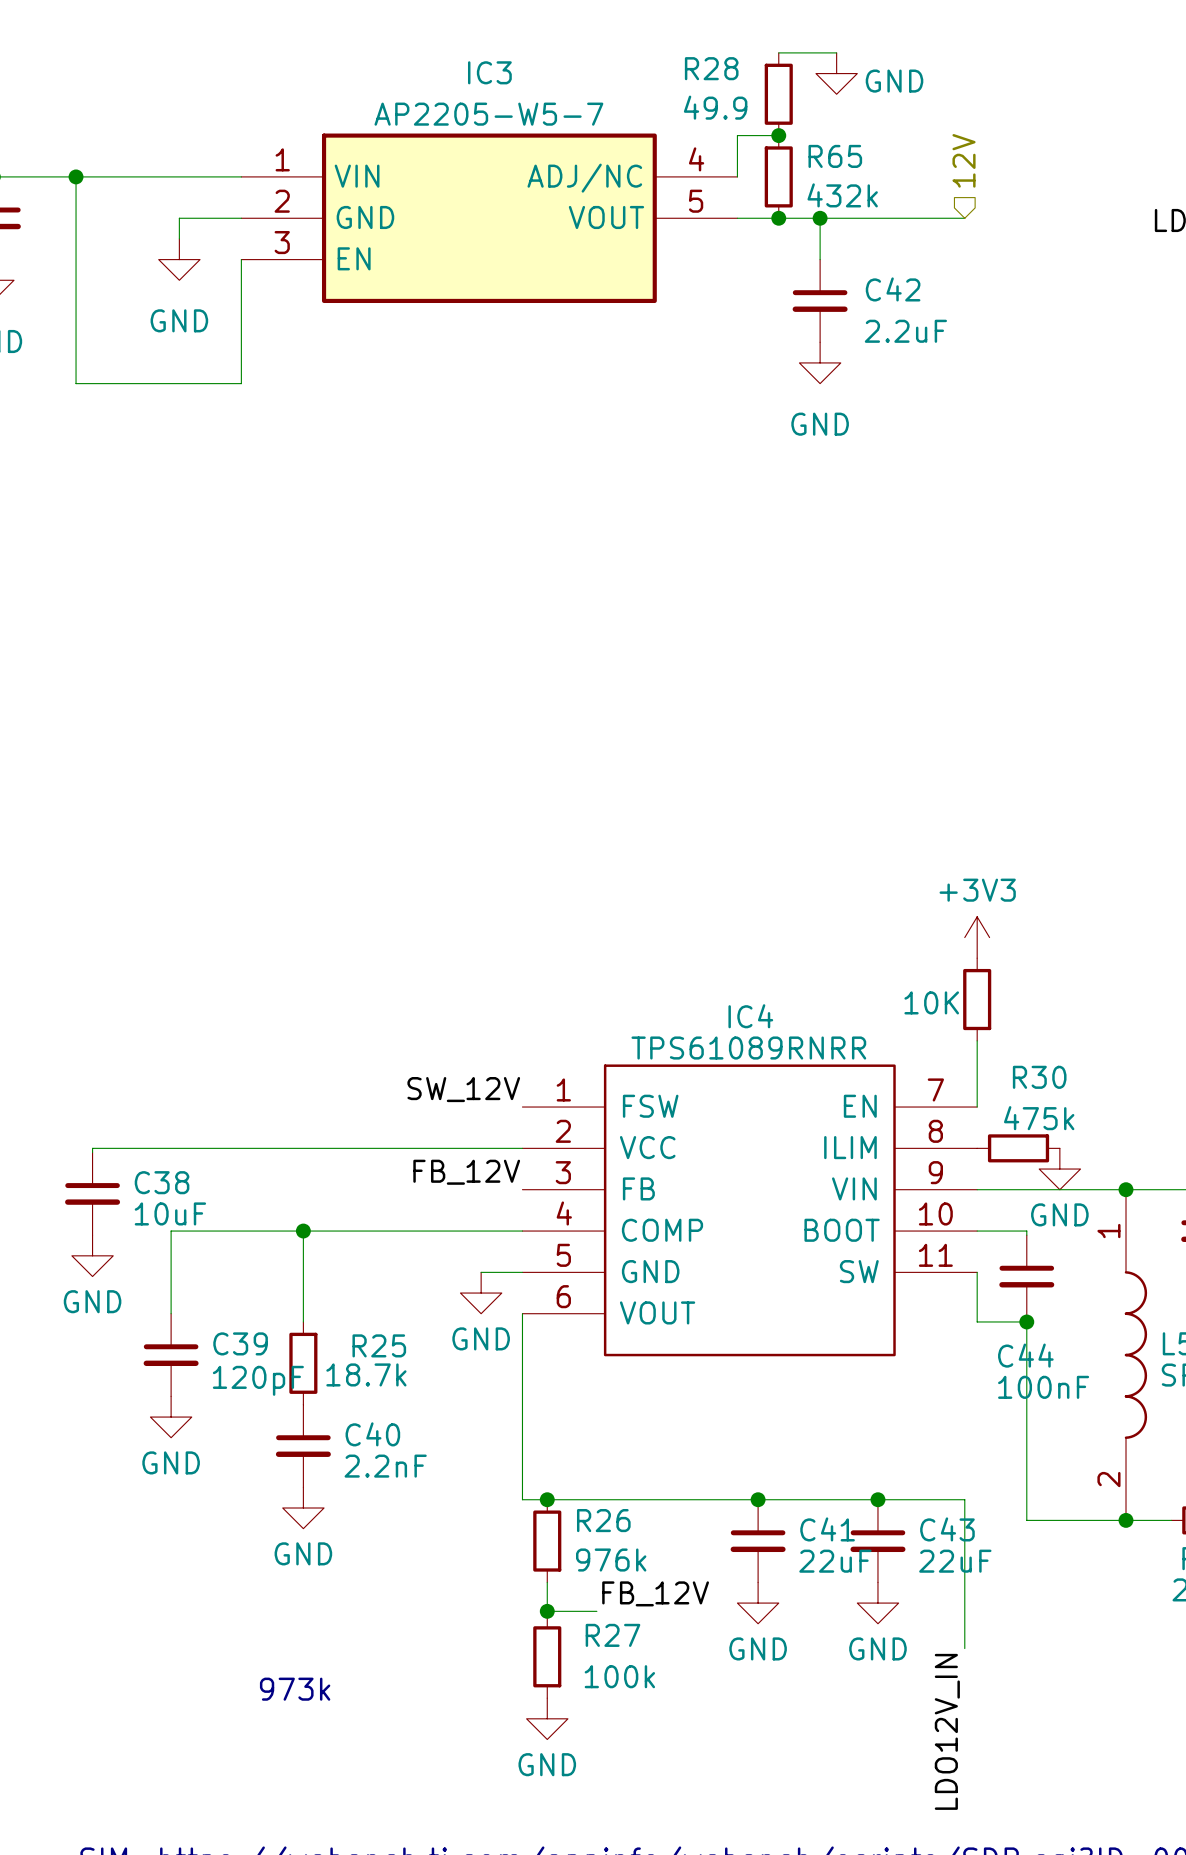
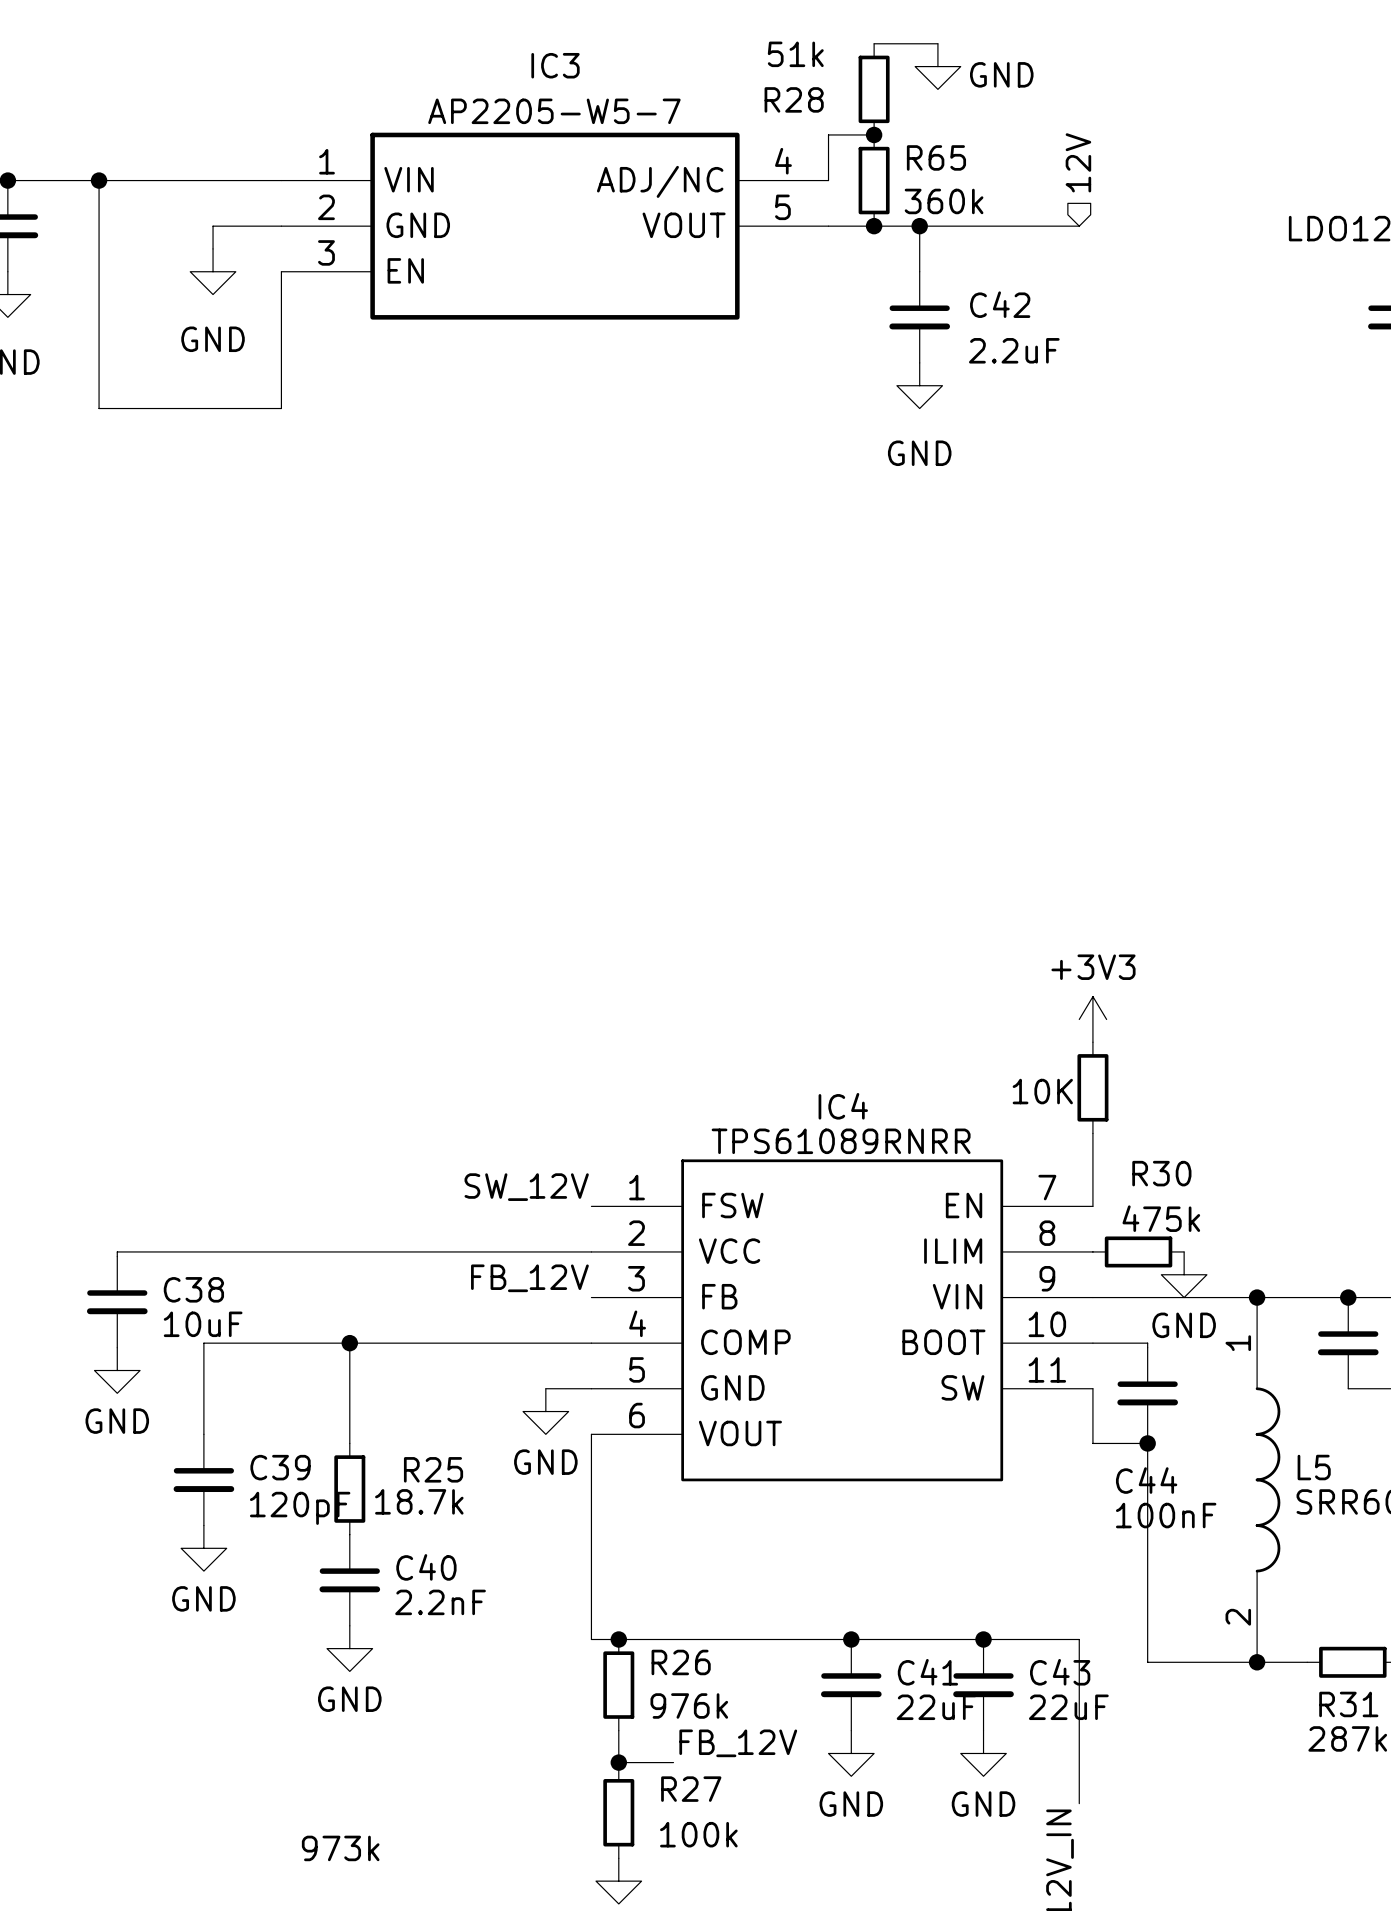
R28 name position: R28 (711, 68) -> R28 (794, 99)
R28 value: 49.9 (715, 107) -> 51k (795, 54)
R65 value: 432k (842, 195) -> 360k (944, 201)

